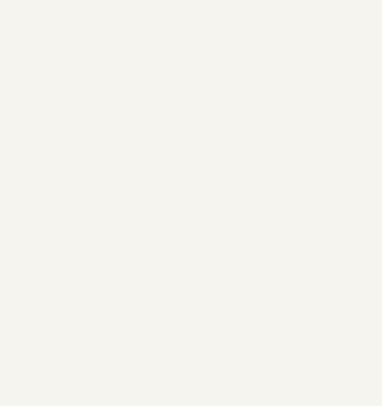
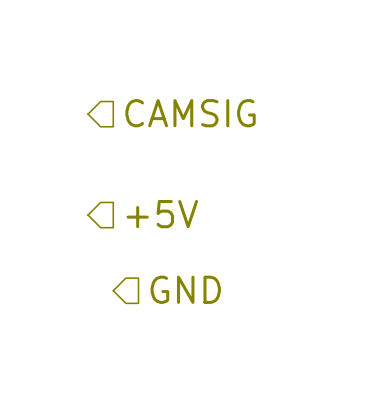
hierarchical label: none -> CAMSIG (190, 113)
hierarchical label: none -> +5V (162, 214)
hierarchical label: none -> GND (185, 289)

